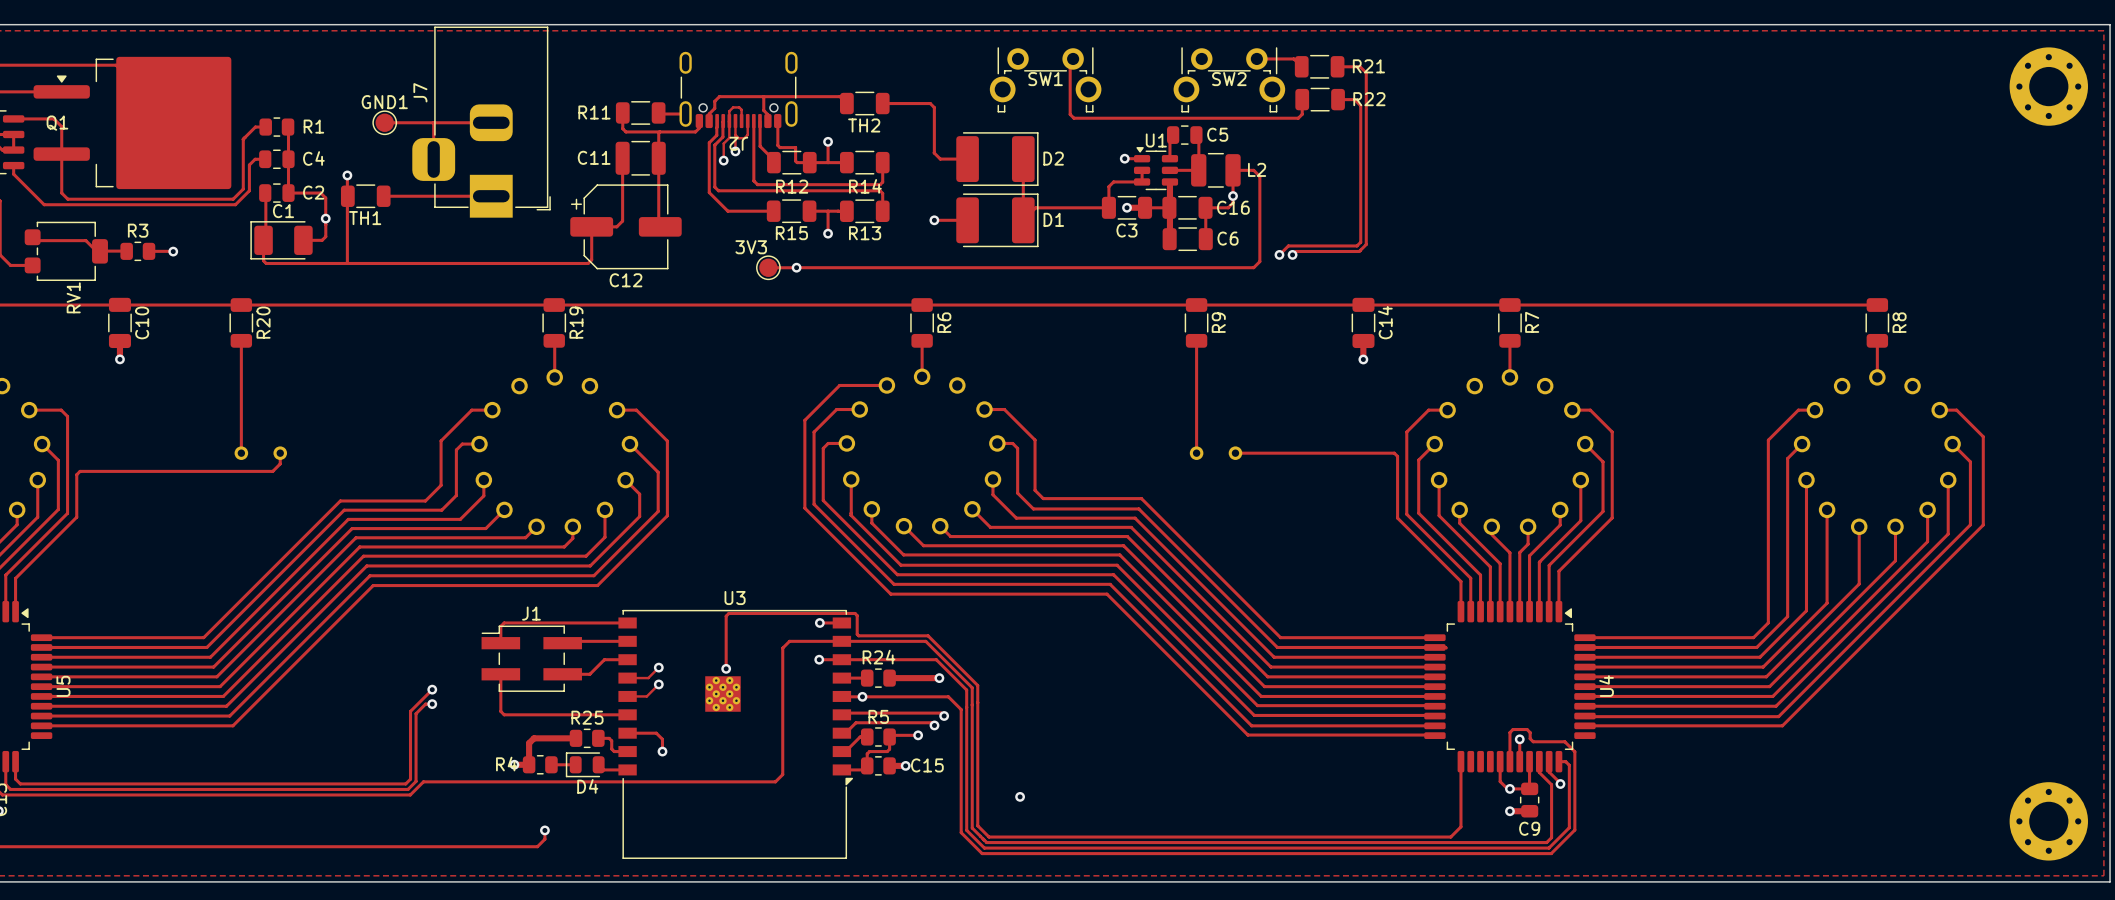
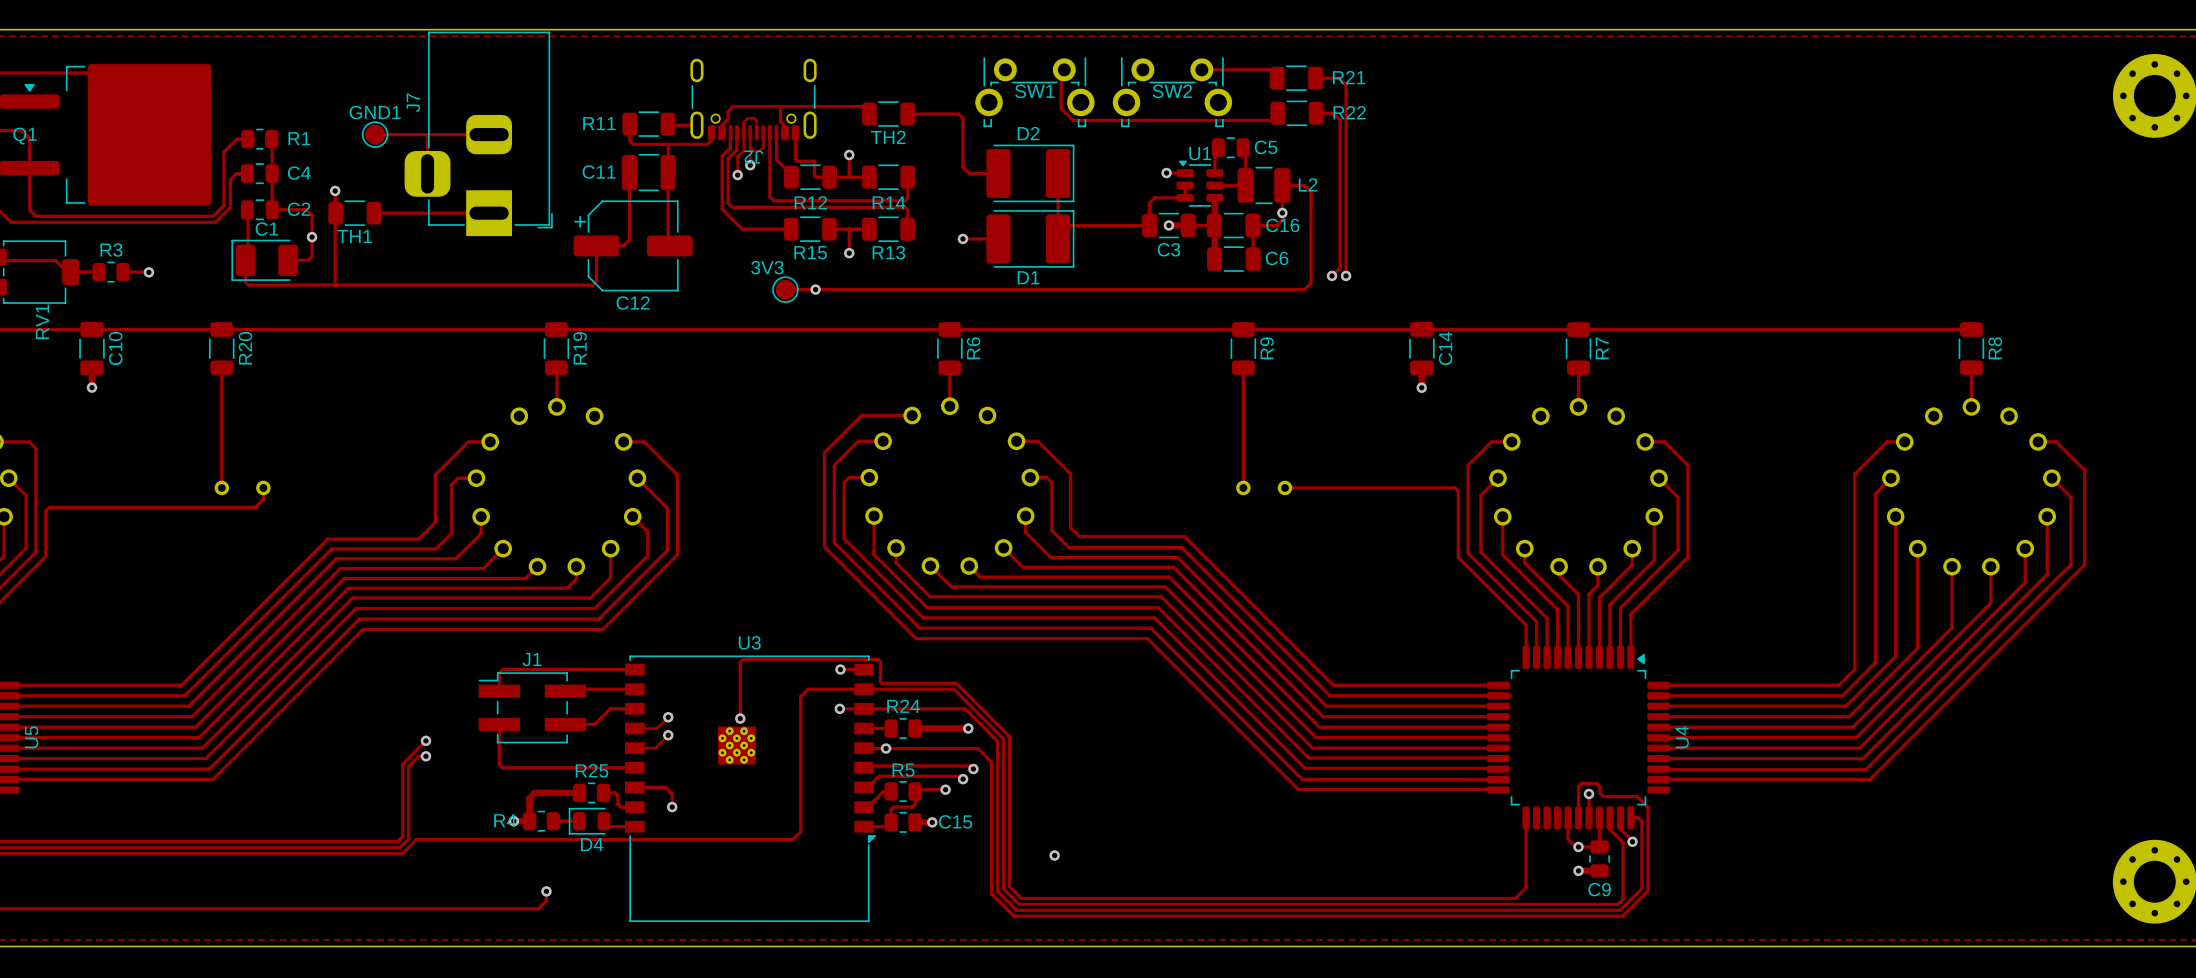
track: (1073, 58) (1070, 61) (1070, 114) (1073, 118) (1298, 118) (1302, 114) (1302, 99) -> none
track: (1256, 58) (1293, 58) (1301, 66) -> none
track: none -> (1064, 69) (1061, 72) (1061, 108) (1073, 120) (1270, 120) (1277, 113)
track: none -> (1201, 69) (1268, 69) (1277, 78)
R21 position: (1319, 66) -> (1296, 78)
track: (1337, 66) (1360, 66) (1366, 72) (1366, 244) (1359, 251) (1295, 251) (1292, 254) -> (1315, 78) (1339, 78) (1346, 84) (1346, 275)
SW1 position: (1045, 79) -> (1034, 92)
SW2 position: (1229, 79) -> (1172, 92)
R22 position: (1320, 99) -> (1296, 113)
track: (1338, 99) (1354, 99) (1360, 105) (1360, 242) (1356, 245) (1287, 247) -> (1316, 113) (1333, 113) (1340, 119) (1340, 267)
D2 name position: D2 (1053, 158) -> D2 (1028, 133)
D1 name position: D1 (1053, 219) -> D1 (1028, 277)

